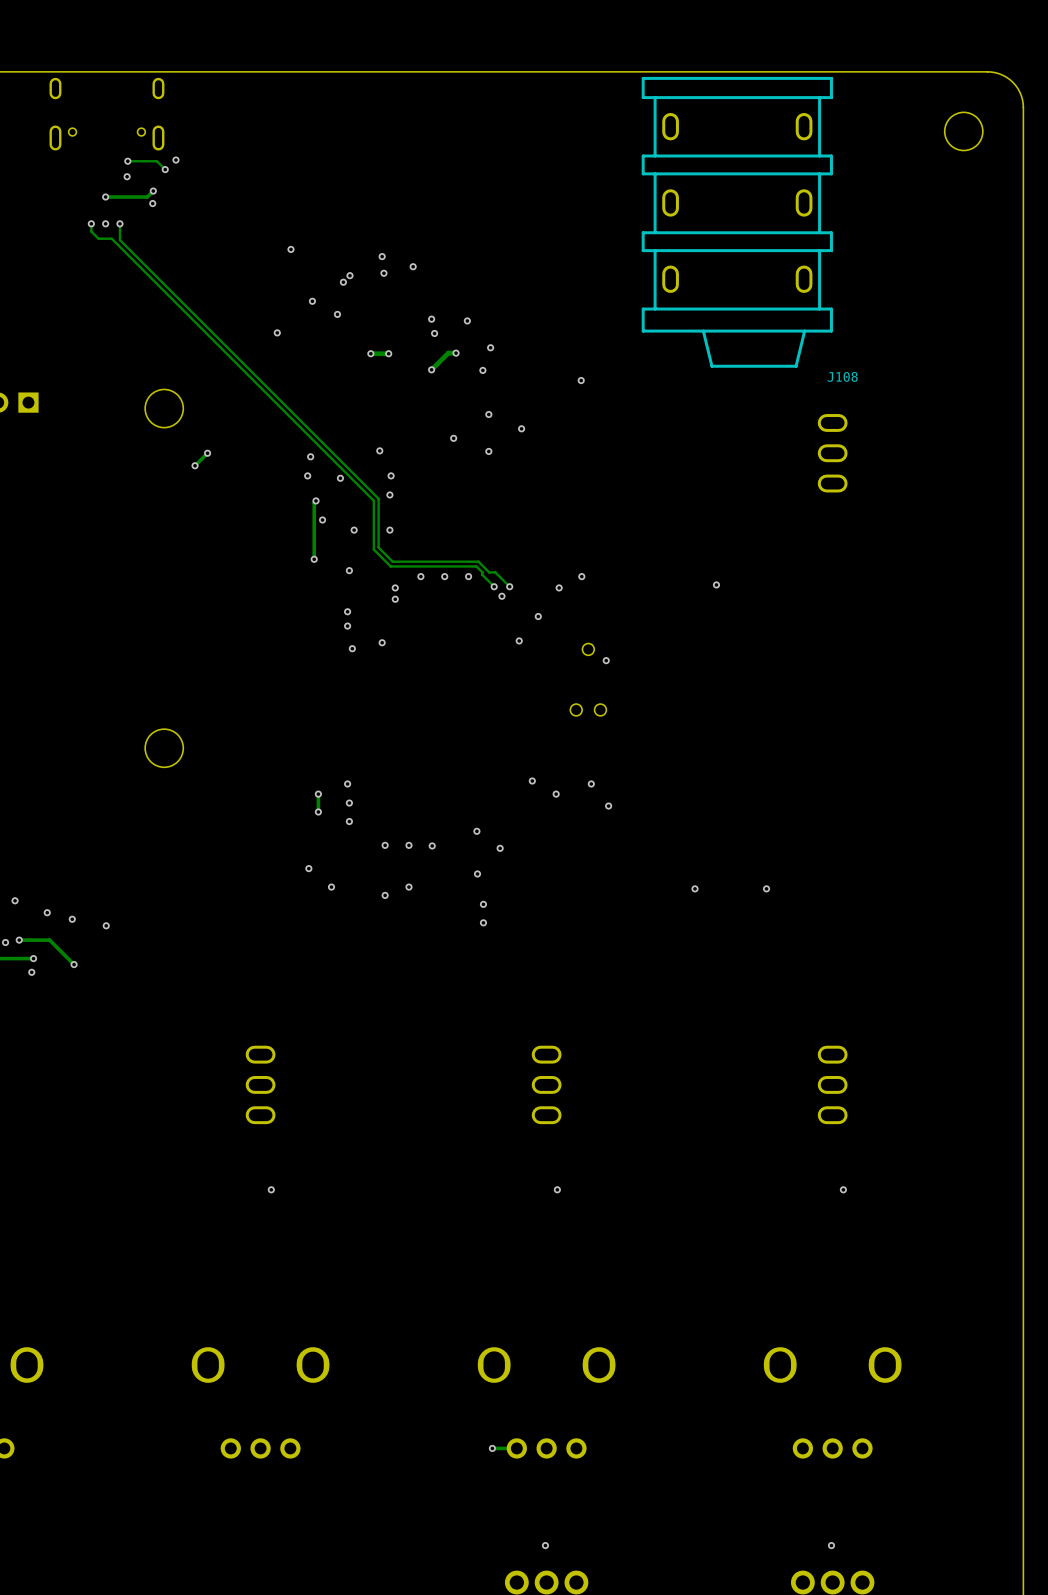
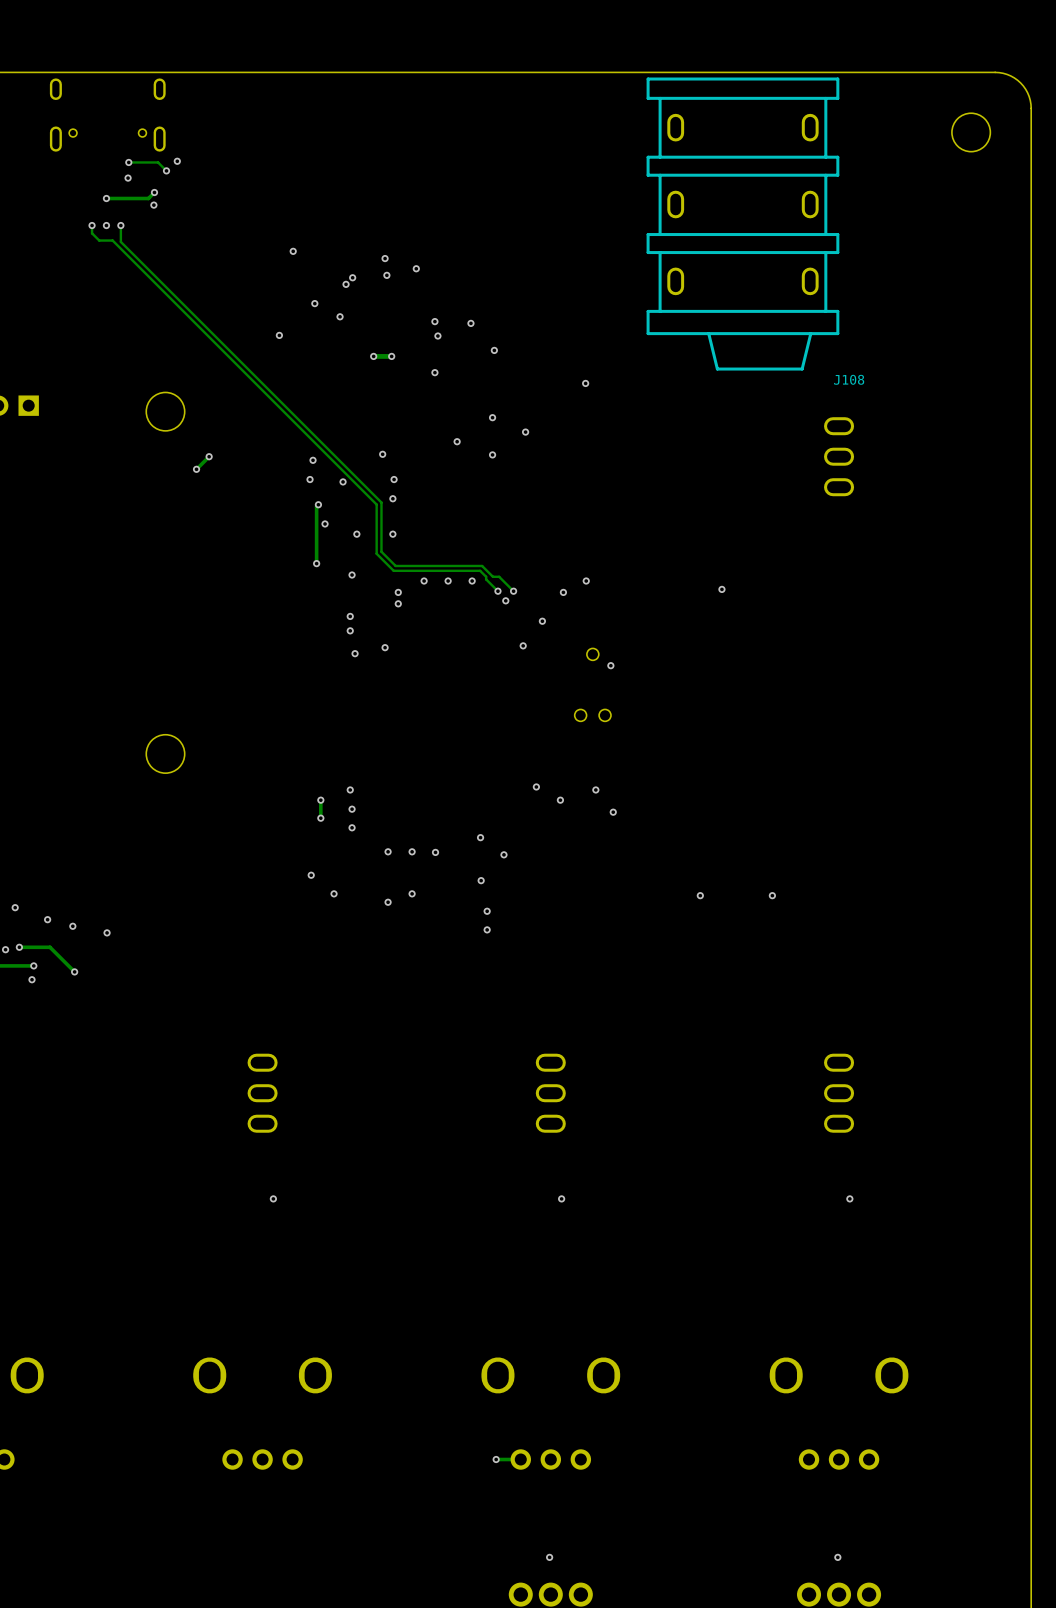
track: (456, 353) (448, 353) (431, 369) -> none
via: (456, 353) -> none
via: (482, 370) -> none

